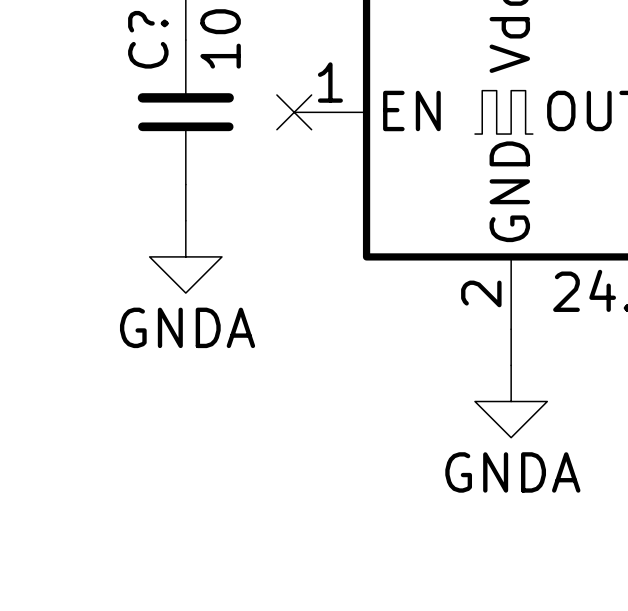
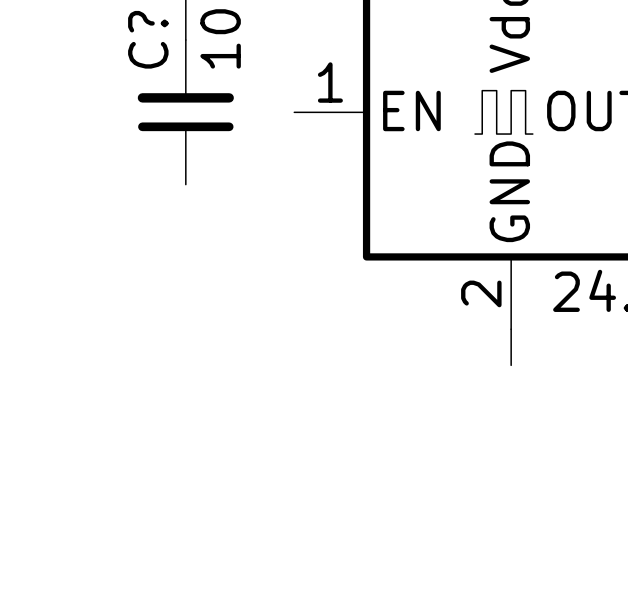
no-connect mark: (294, 112) -> none
wire: (185, 184) (185, 220) -> none
power symbol: GNDA (185, 256) -> none
power symbol: GNDA (511, 401) -> none

